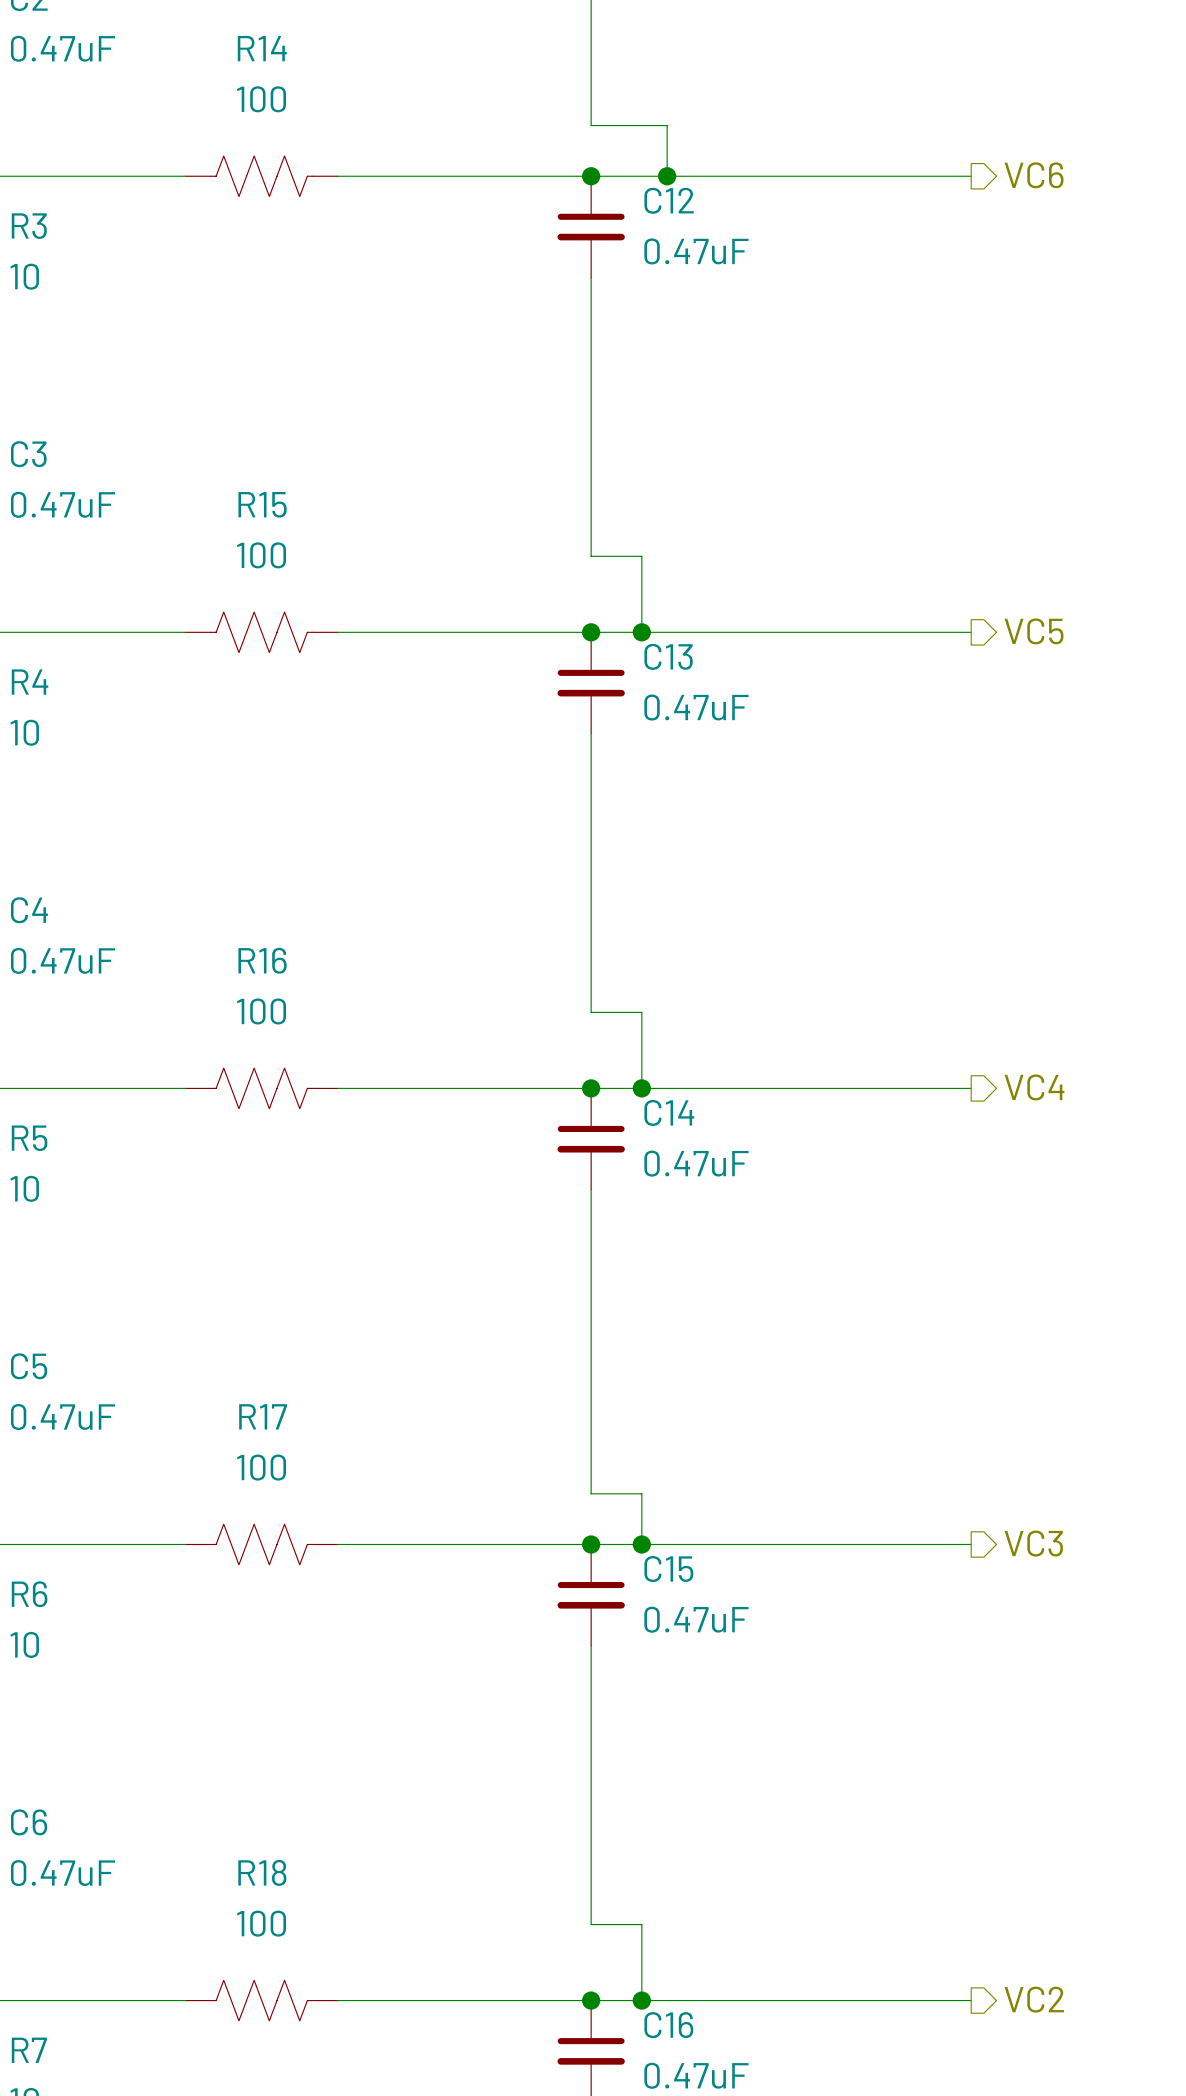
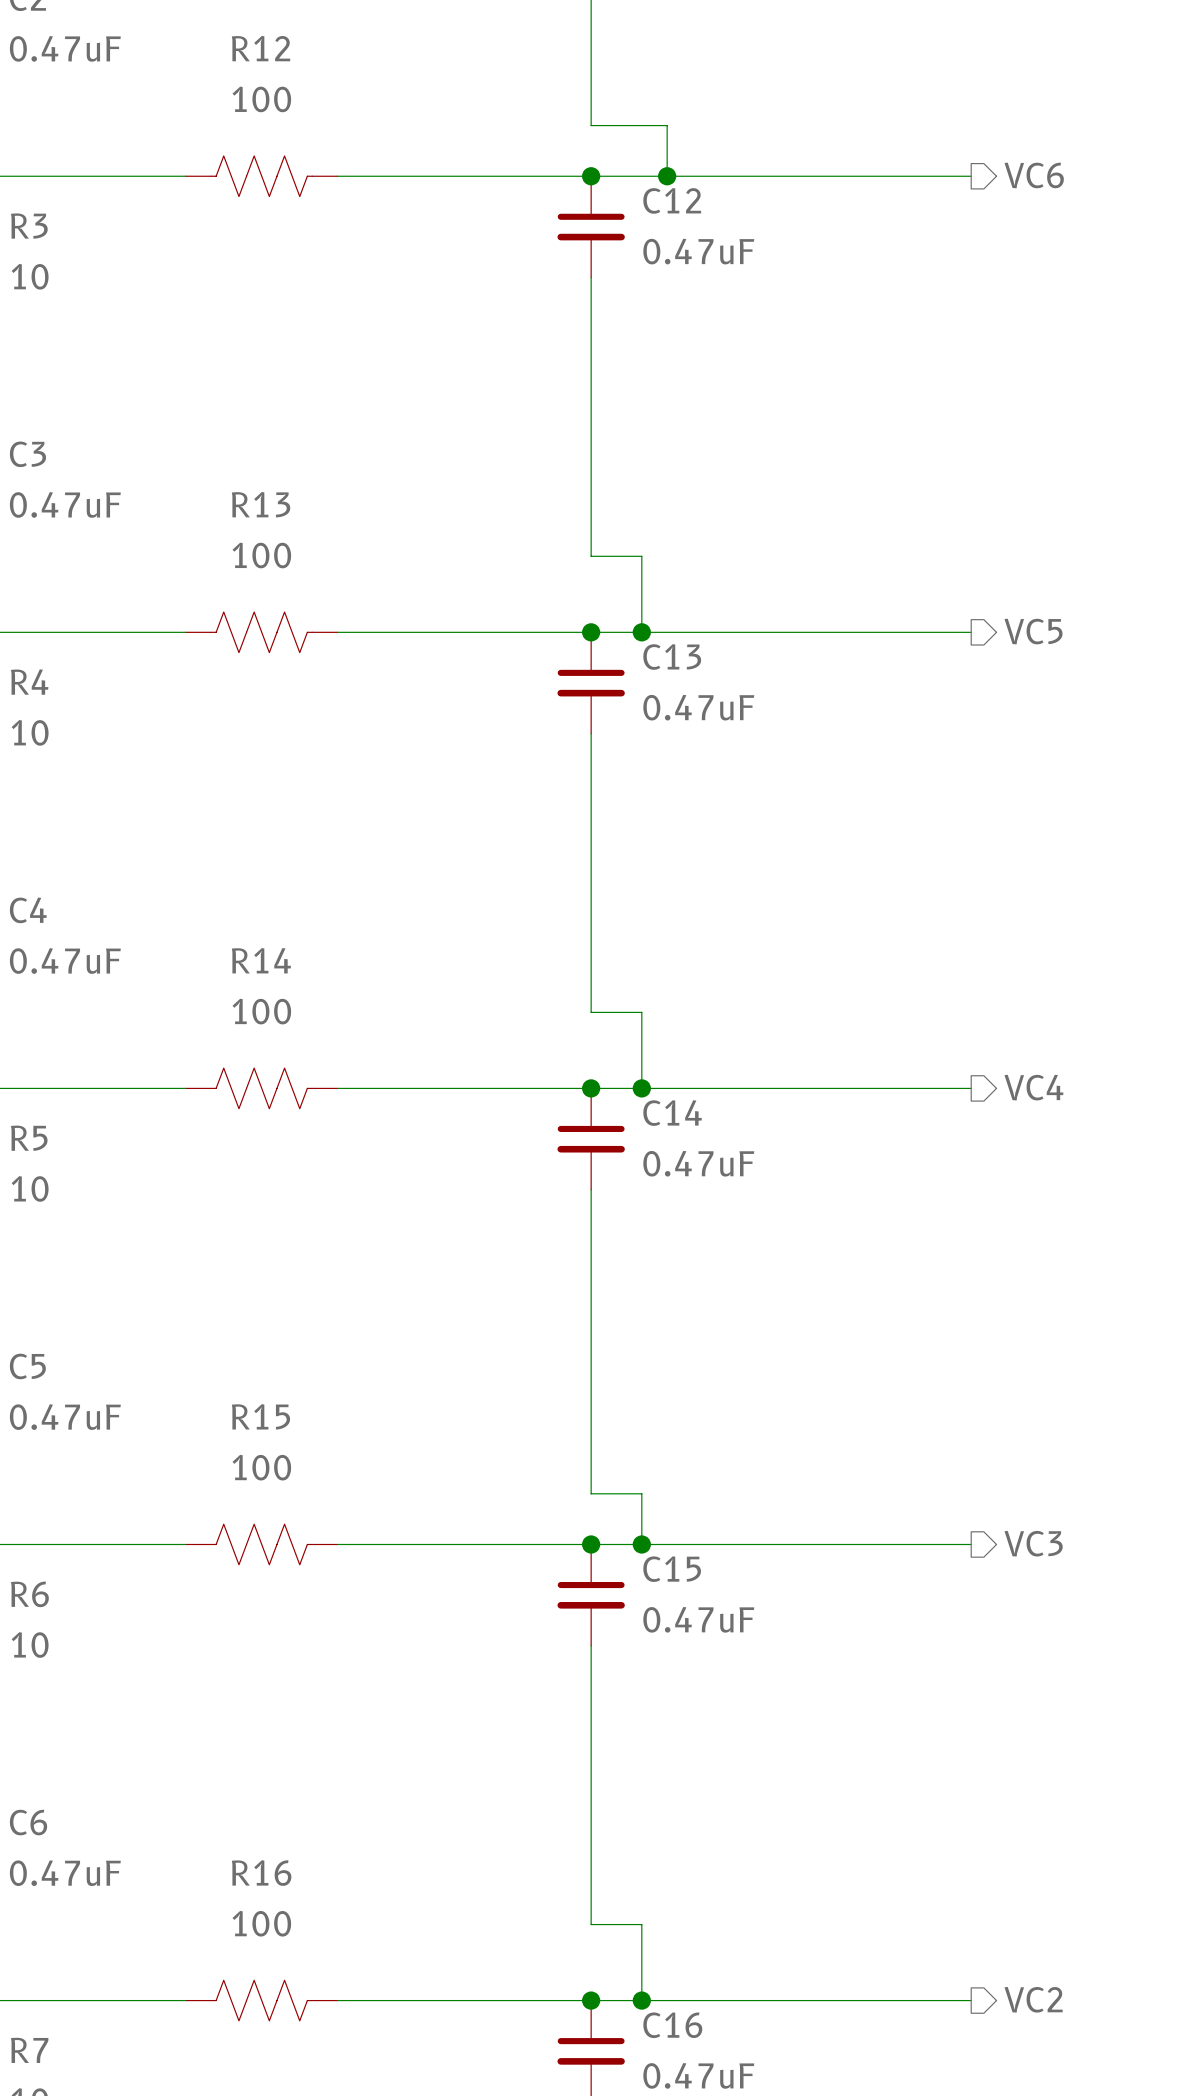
R14 name: R14 (262, 48) -> R12 (261, 48)
R15 name: R15 (262, 504) -> R13 (261, 504)
R16 name: R16 (262, 960) -> R14 (261, 960)
R17 name: R17 (263, 1416) -> R15 (260, 1416)
R18 name: R18 (262, 1872) -> R16 (261, 1873)

